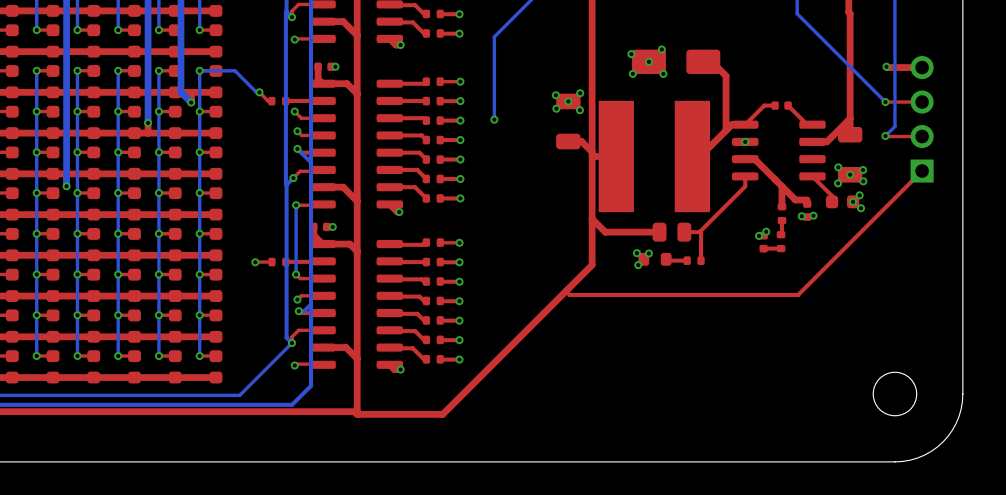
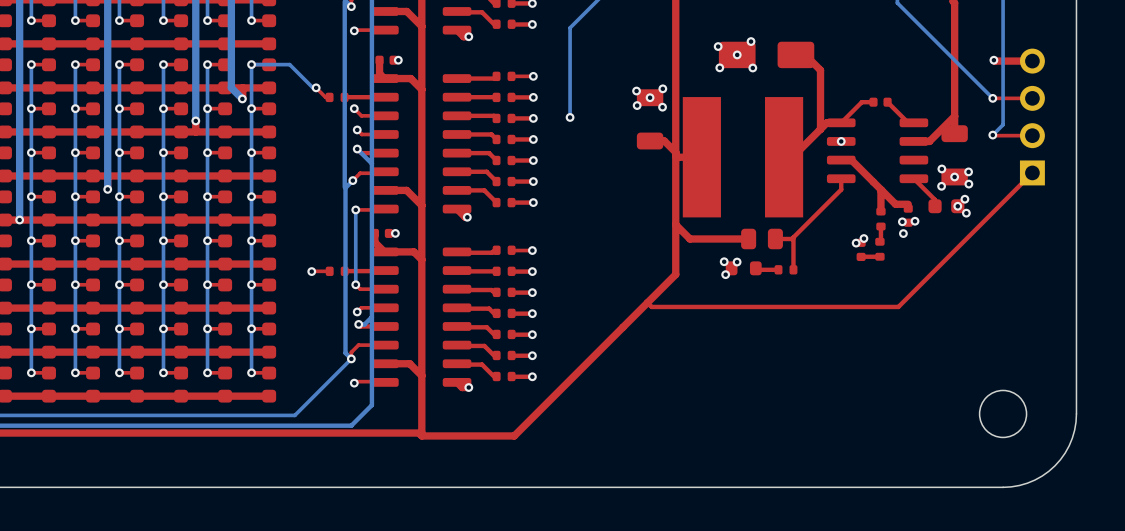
via: none -> (903, 233)

